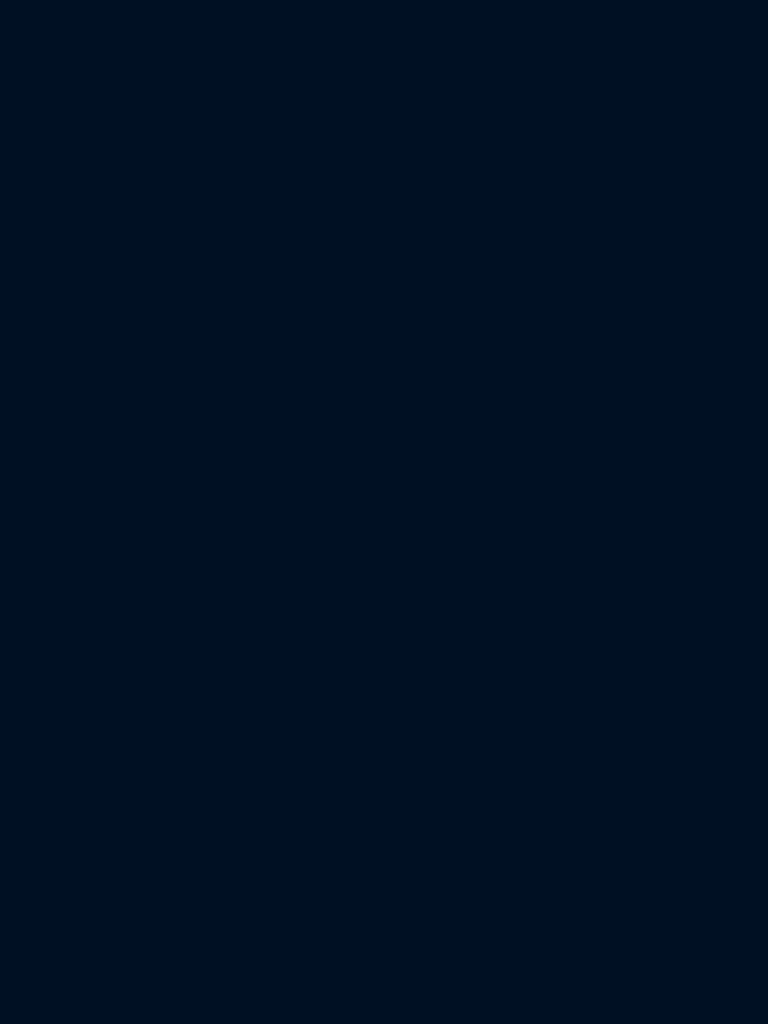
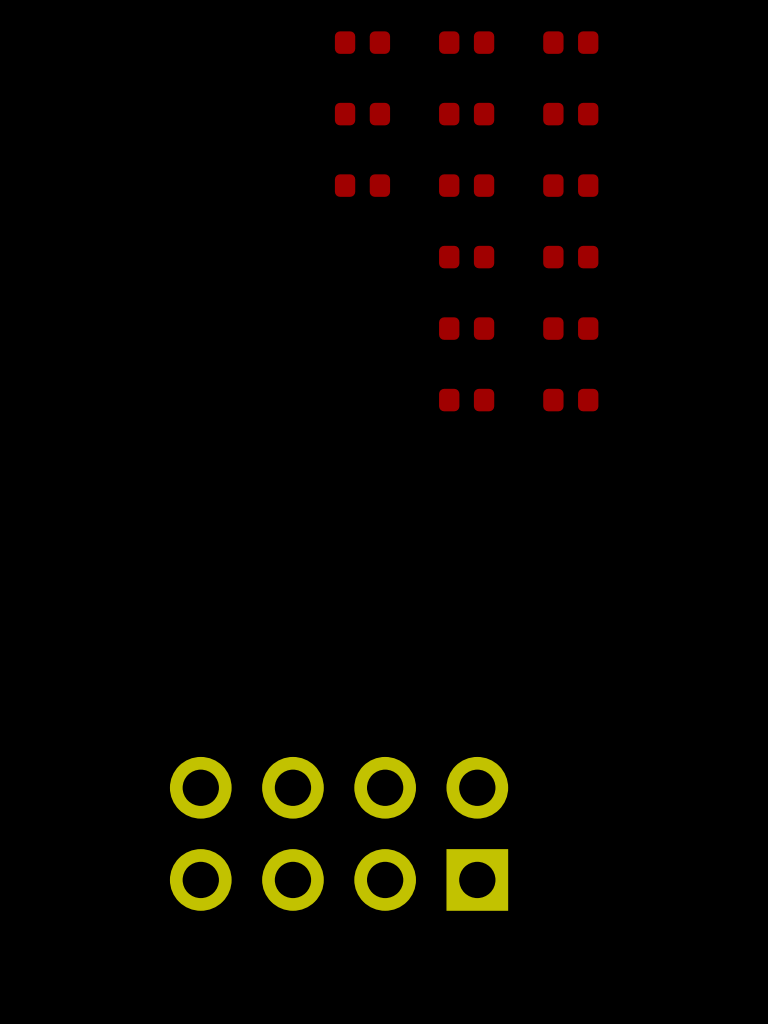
part: none -> (362, 42)
part: none -> (466, 42)
part: none -> (570, 42)
part: none -> (362, 114)
part: none -> (466, 114)
part: none -> (570, 114)
part: none -> (362, 185)
part: none -> (466, 185)
part: none -> (570, 185)
part: none -> (466, 257)
part: none -> (570, 257)
part: none -> (466, 328)
part: none -> (570, 328)
part: none -> (466, 400)
part: none -> (570, 400)
part: none -> (339, 833)

